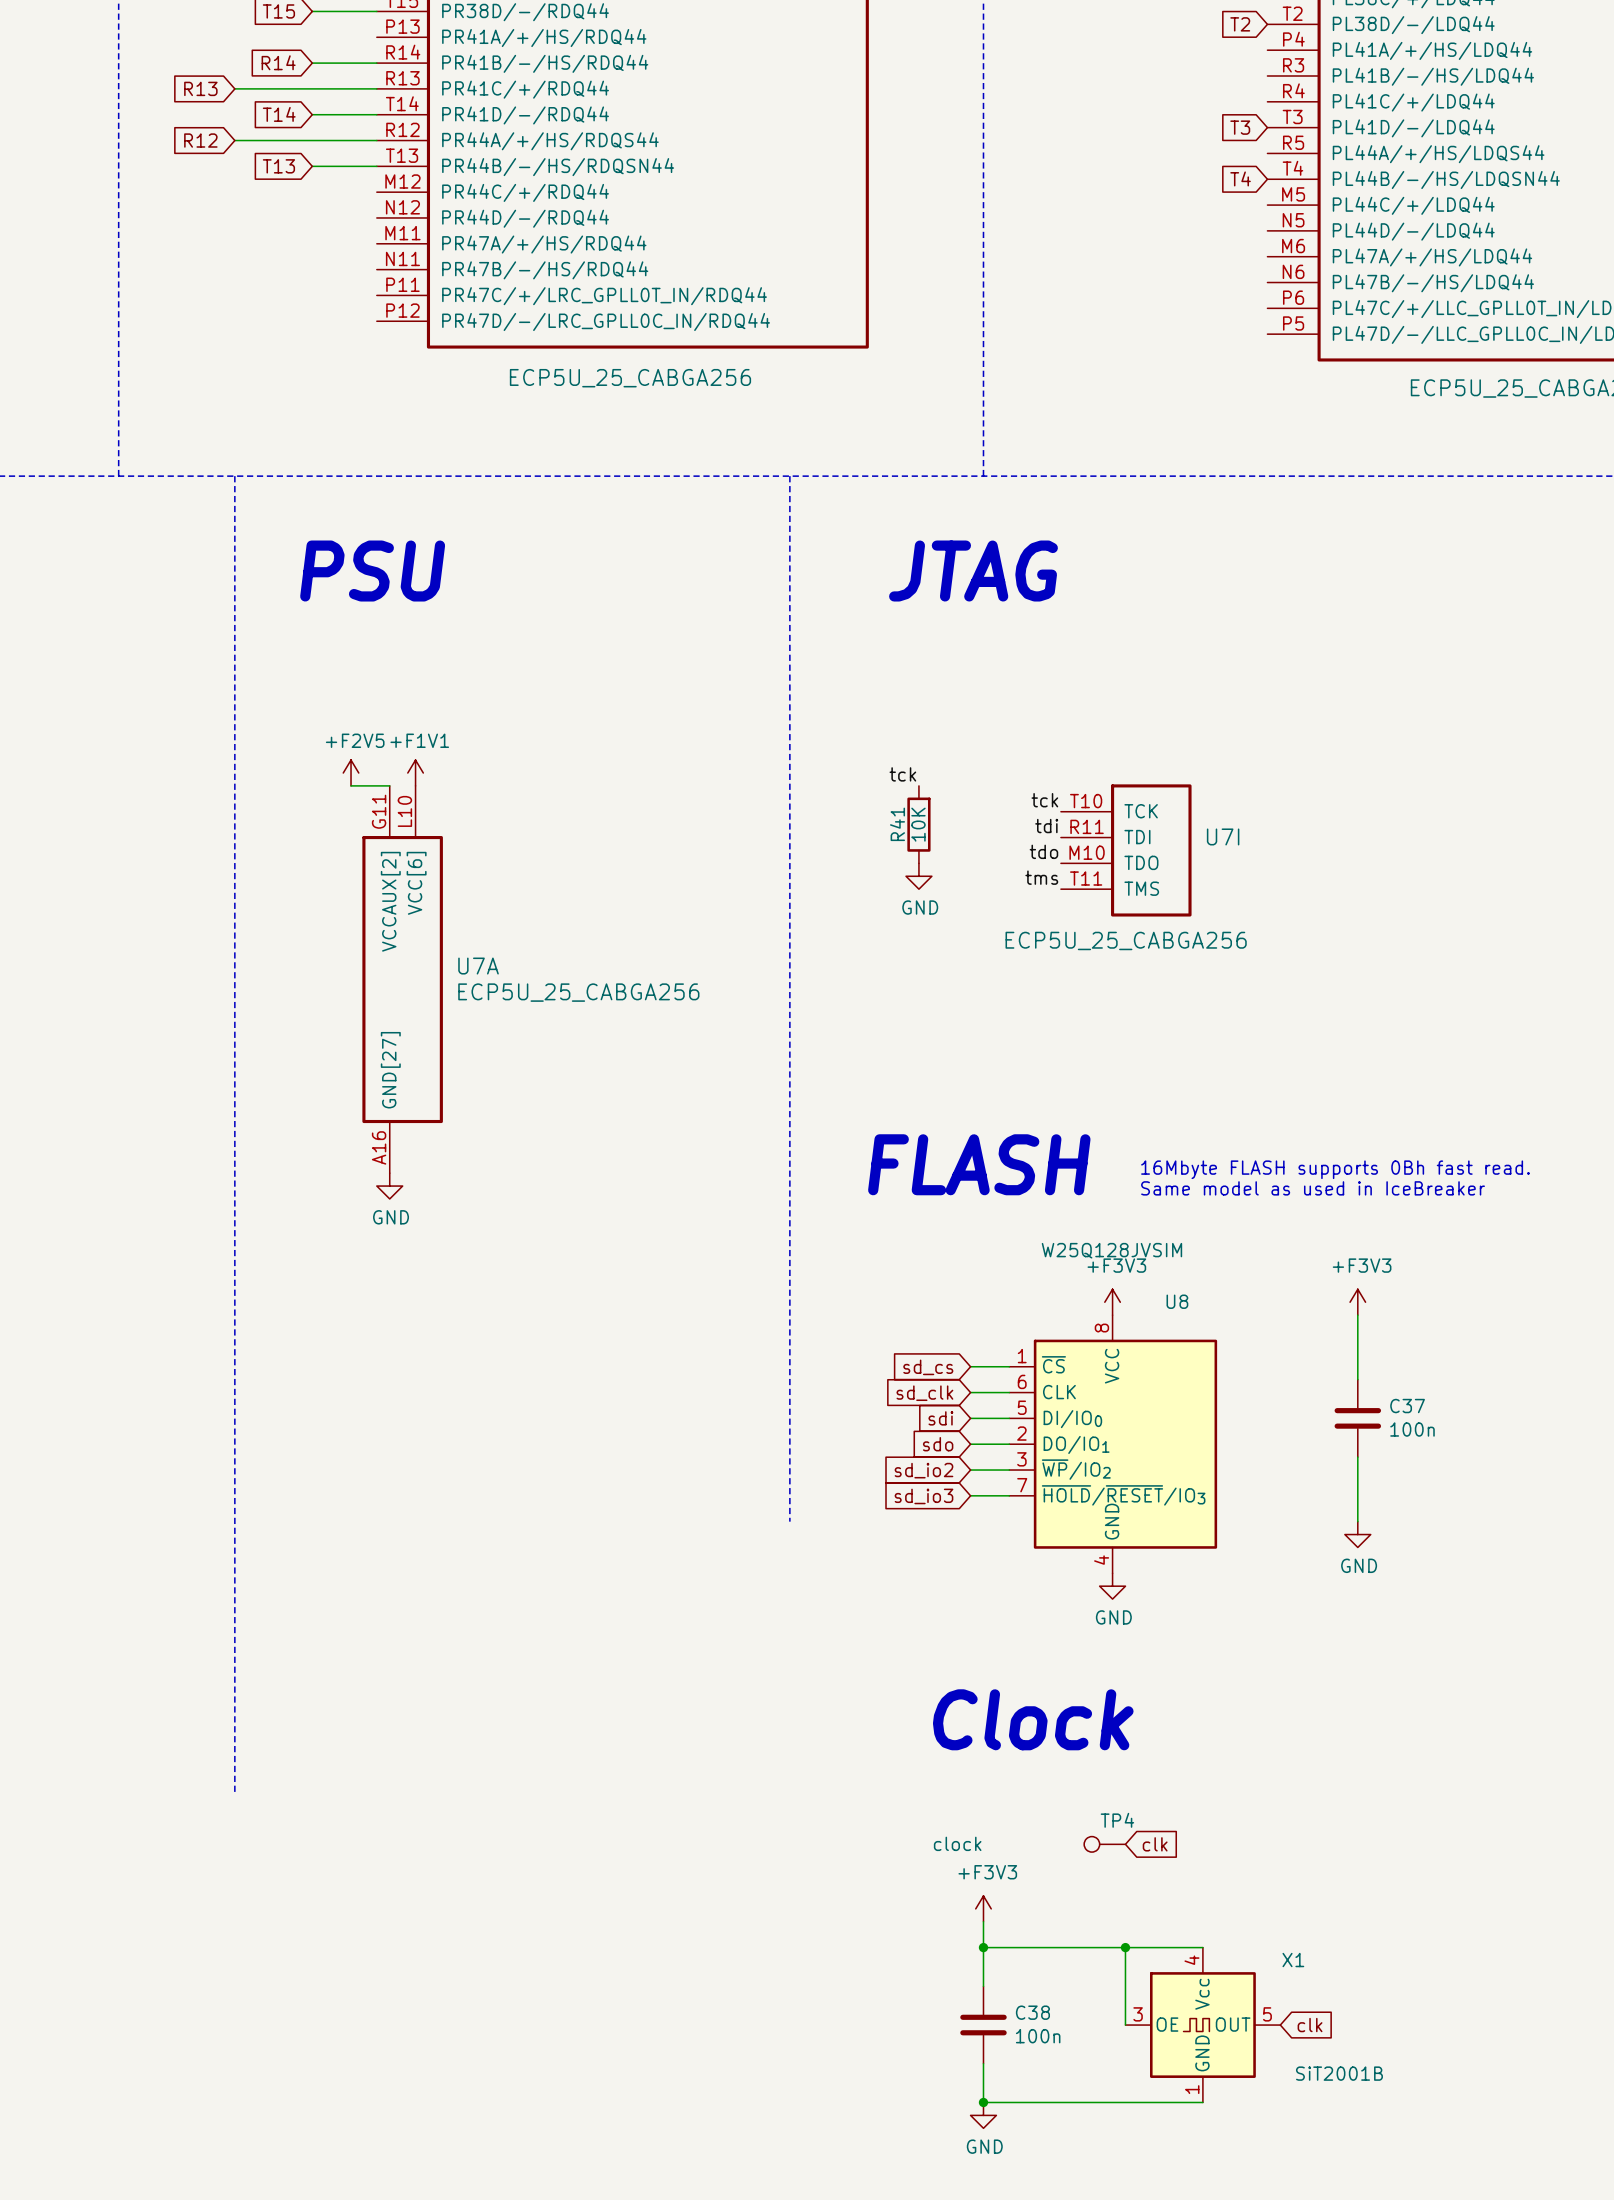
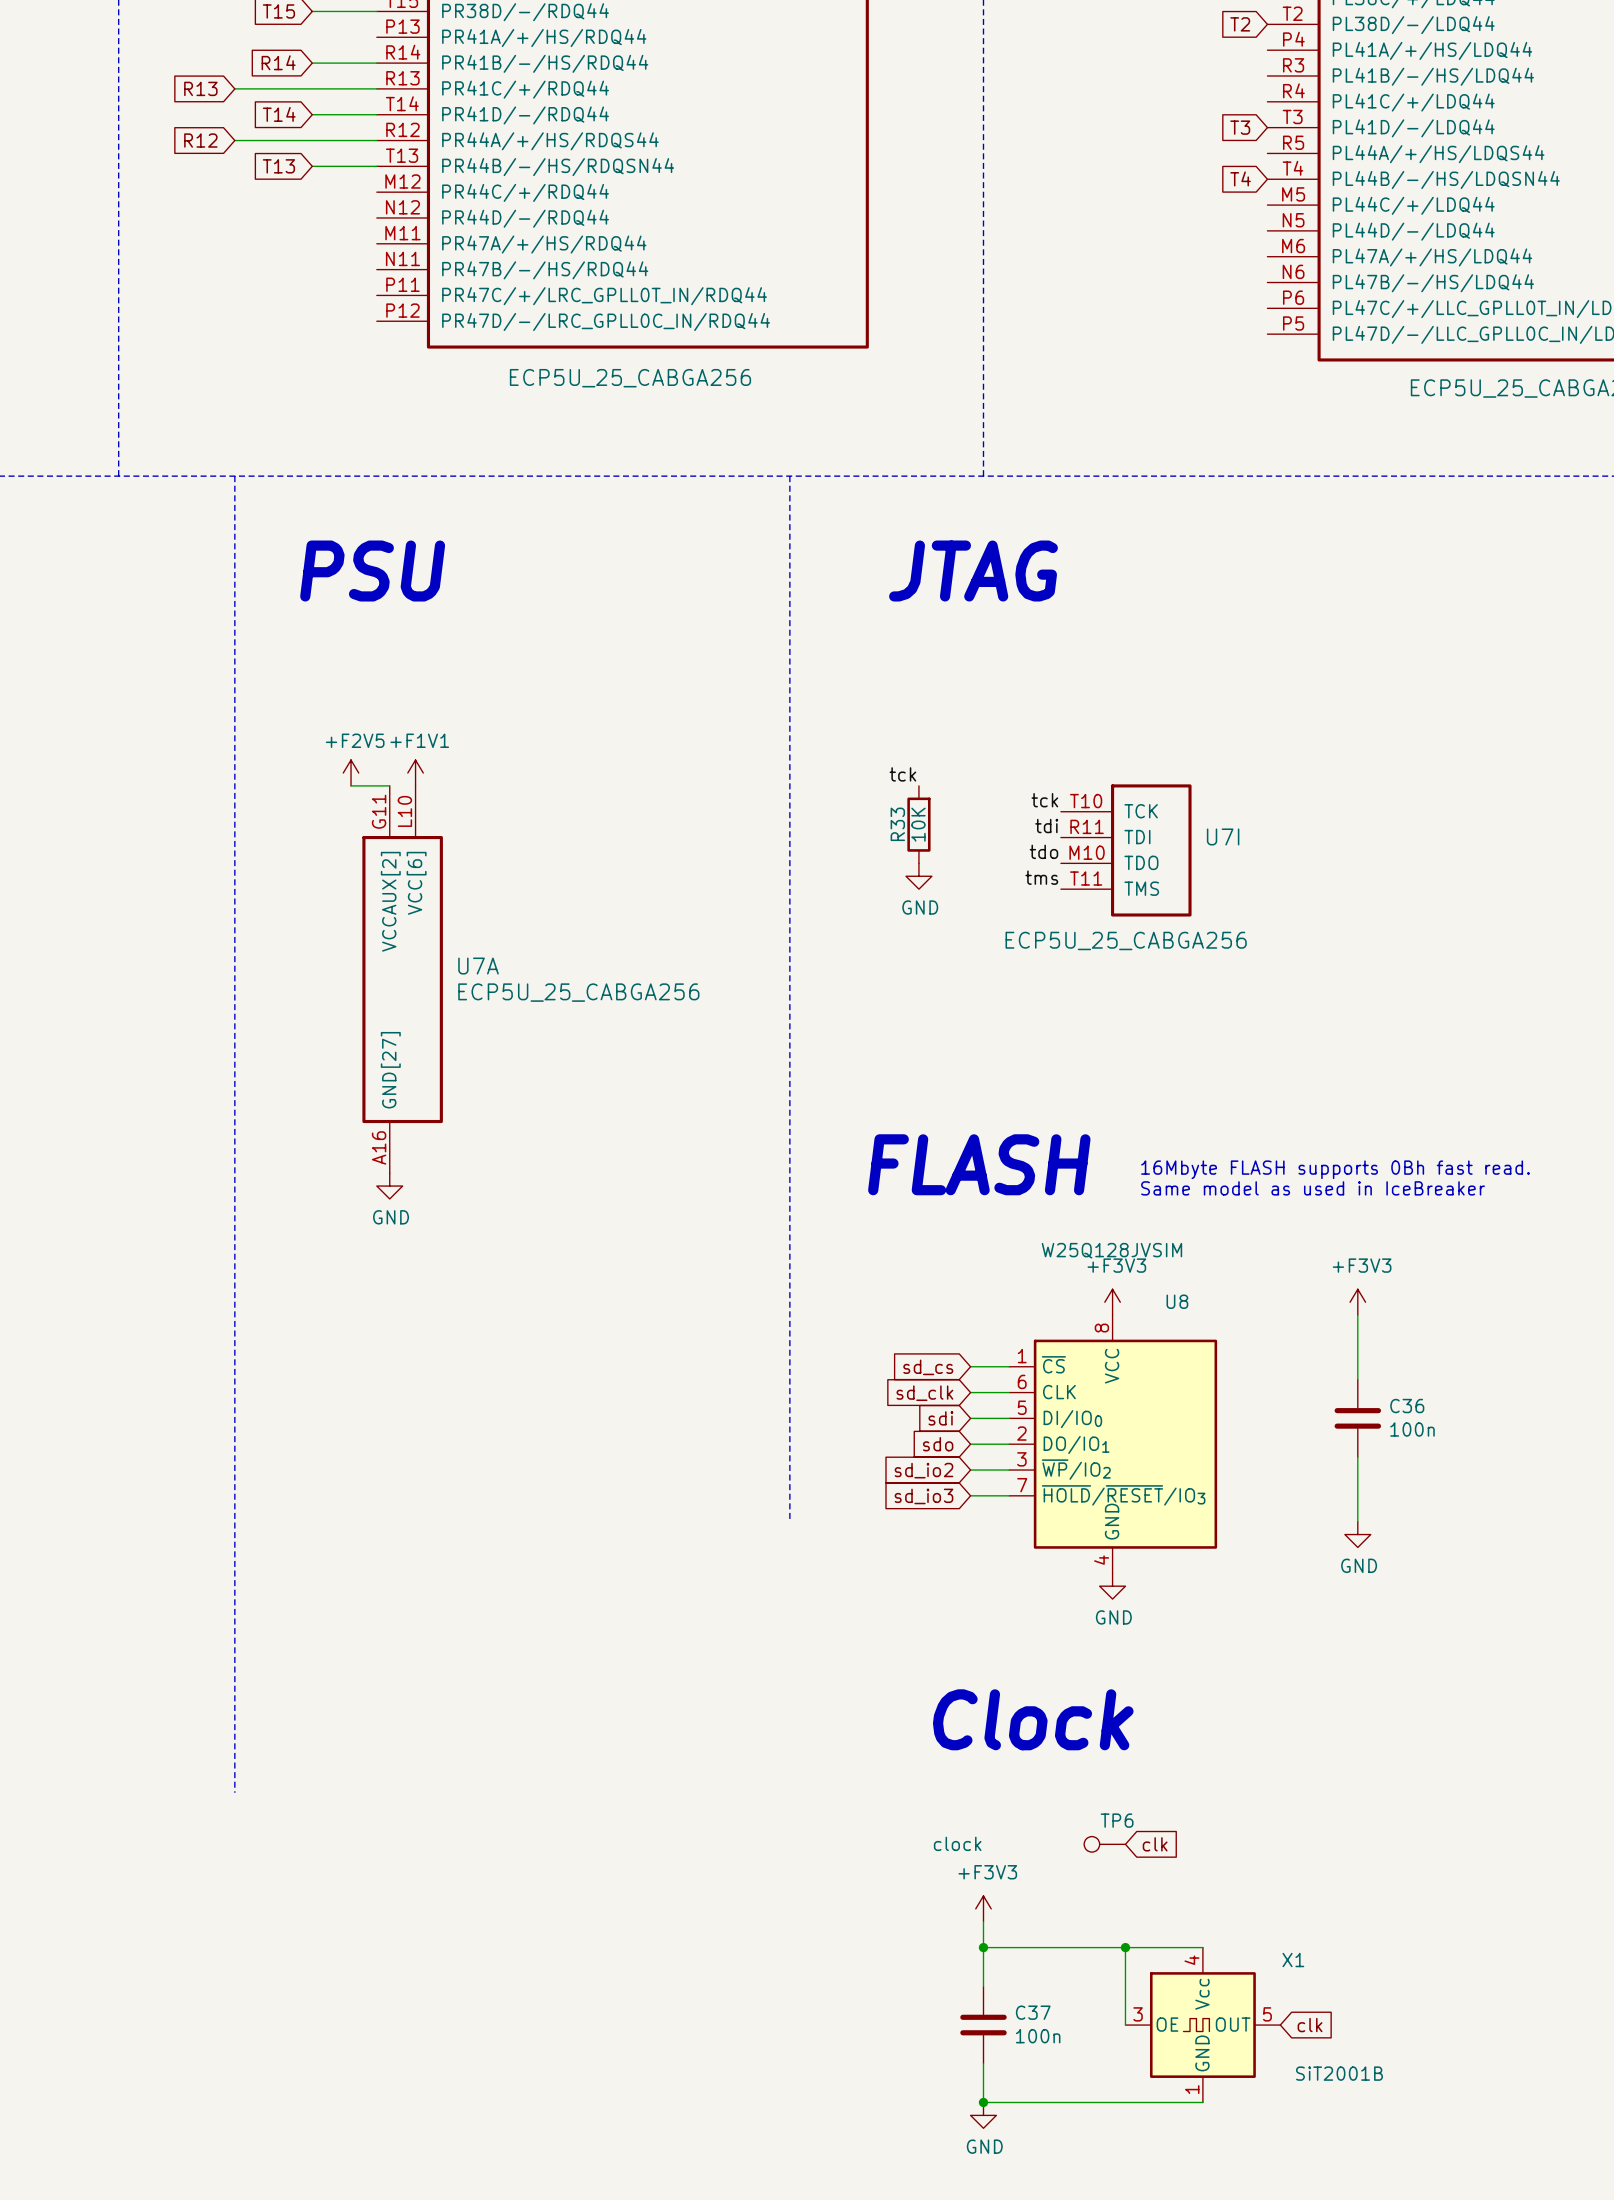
R41 name: R41 (897, 824) -> R33 (897, 824)
C37 name: C37 (1407, 1406) -> C36 (1407, 1406)
TP4 name: TP4 (1117, 1820) -> TP6 (1117, 1820)
C38 name: C38 (1032, 2012) -> C37 (1033, 2012)

